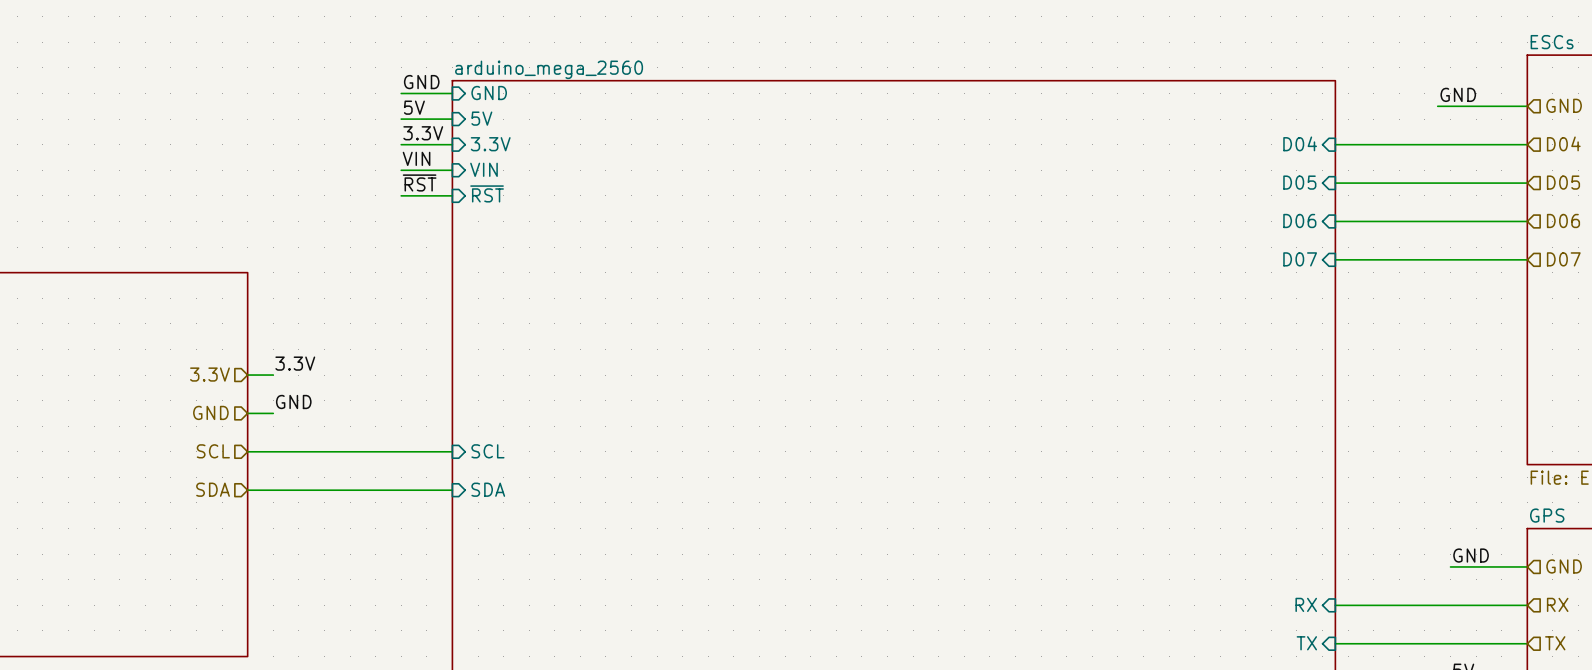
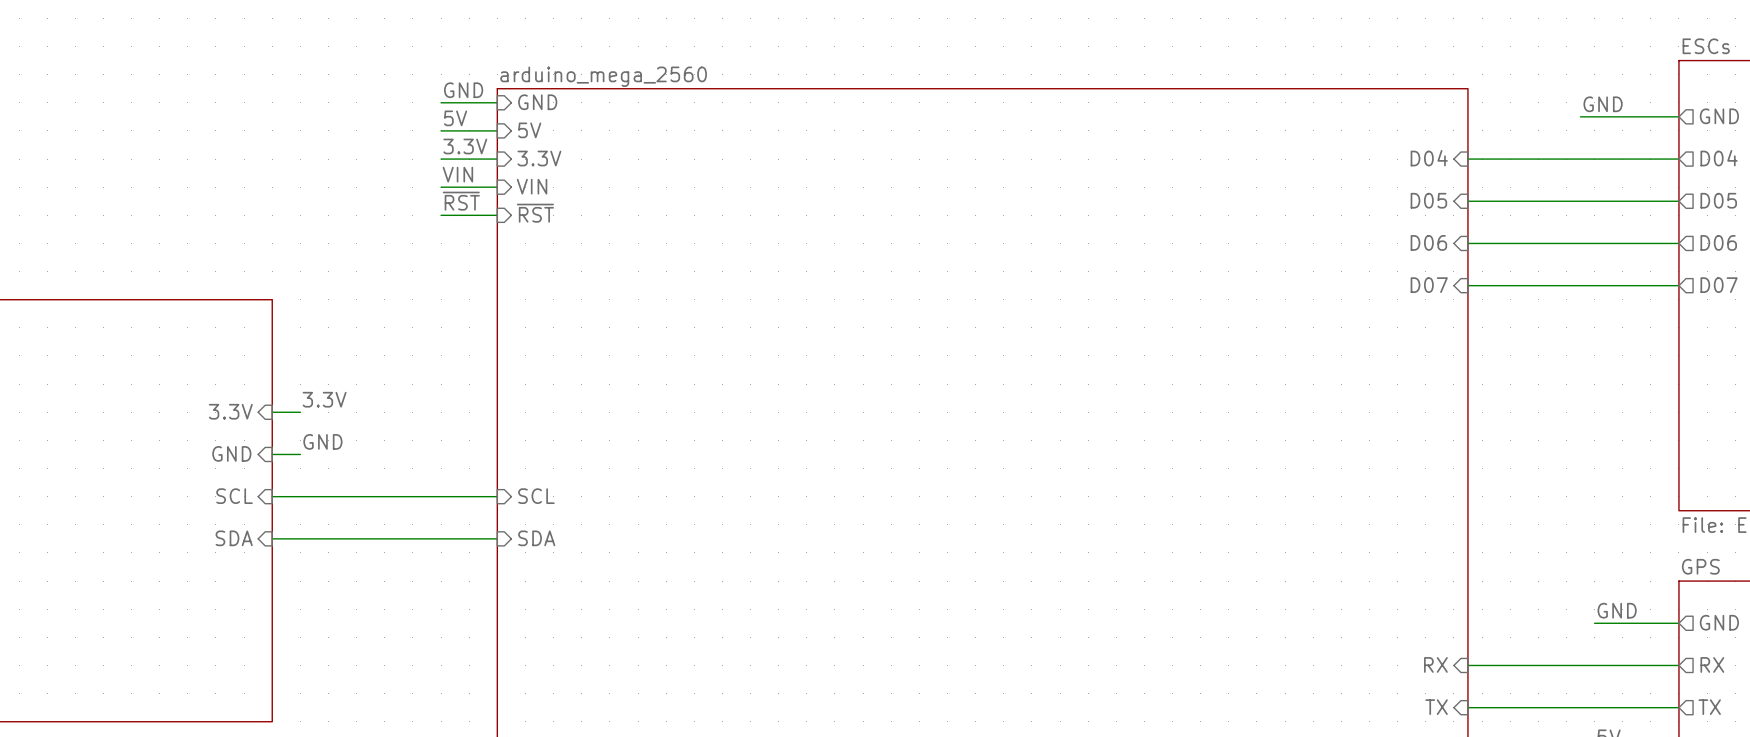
hierarchical label: 3.3V (209, 374) -> none
sheet pin: none -> 3.3V (230, 411)
hierarchical label: GND (210, 412) -> none
sheet pin: none -> GND (231, 453)
hierarchical label: SCL (213, 451) -> none
sheet pin: none -> SCL (234, 496)
hierarchical label: SDA (213, 489) -> none
sheet pin: none -> SDA (234, 538)

